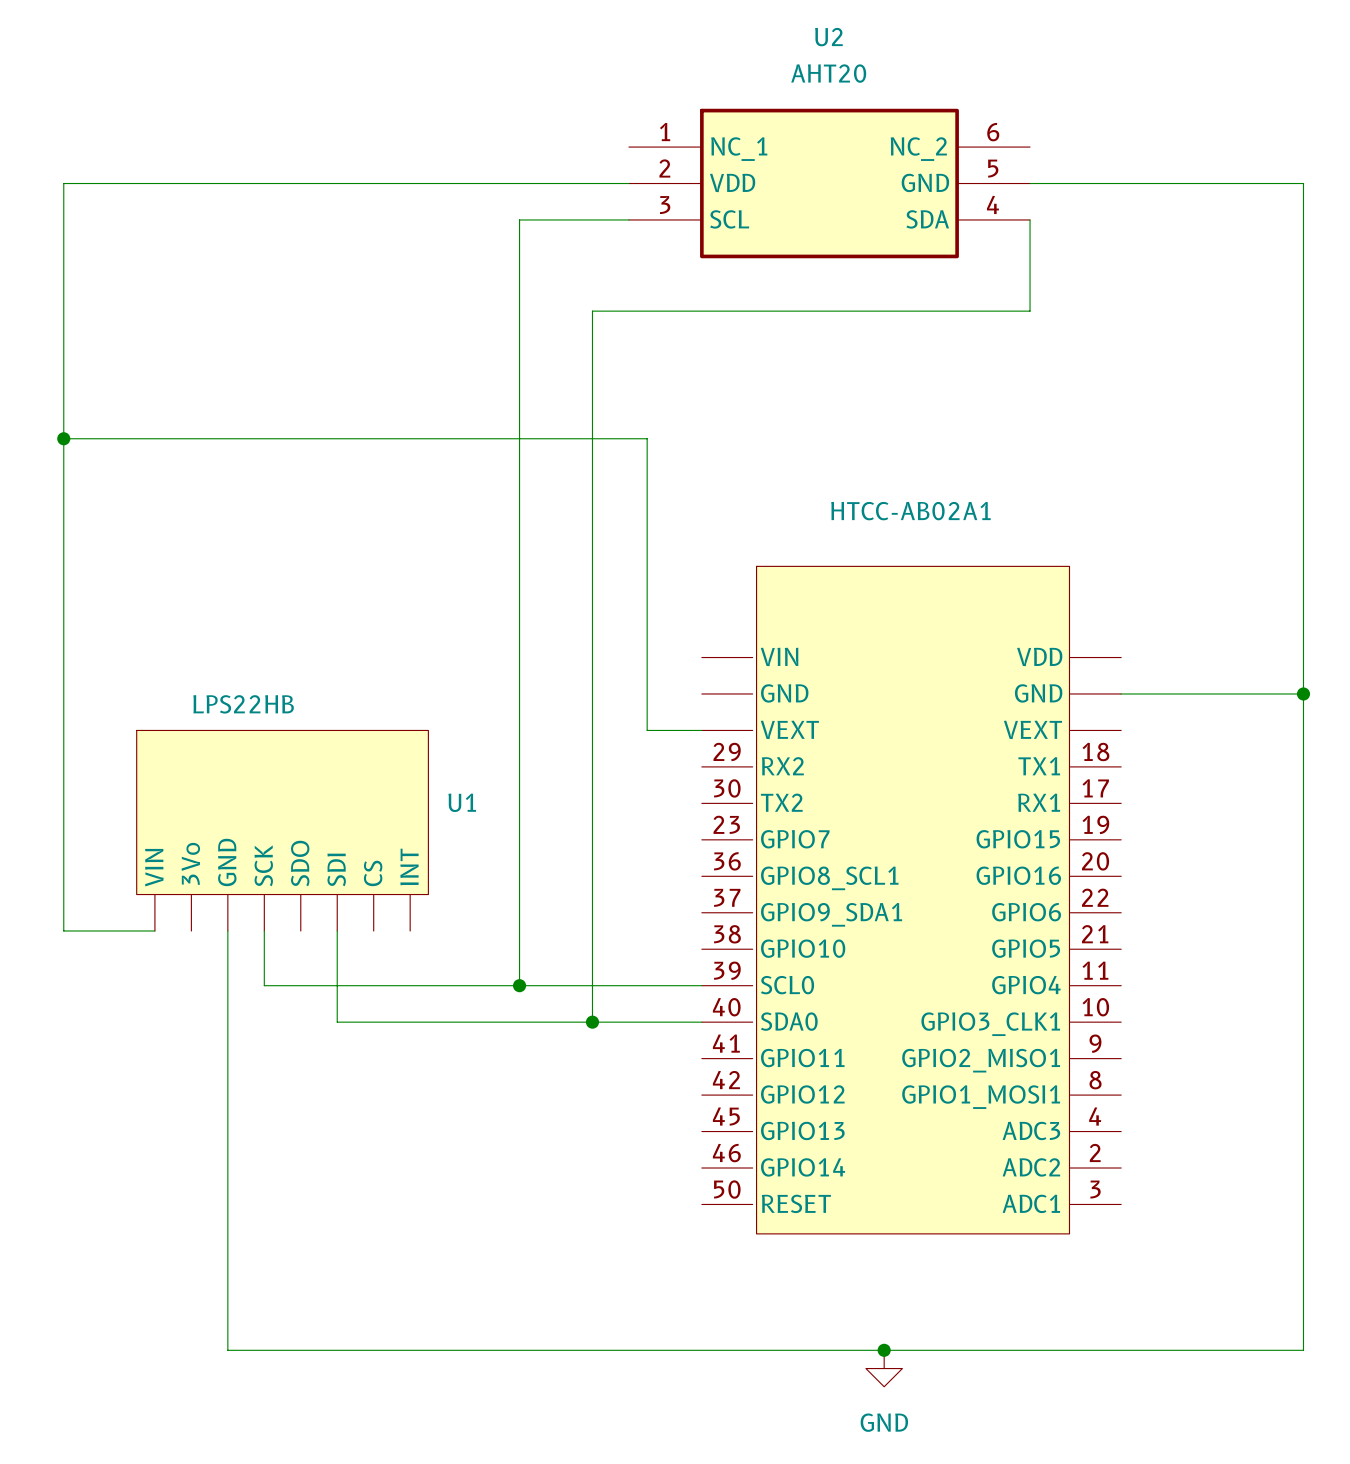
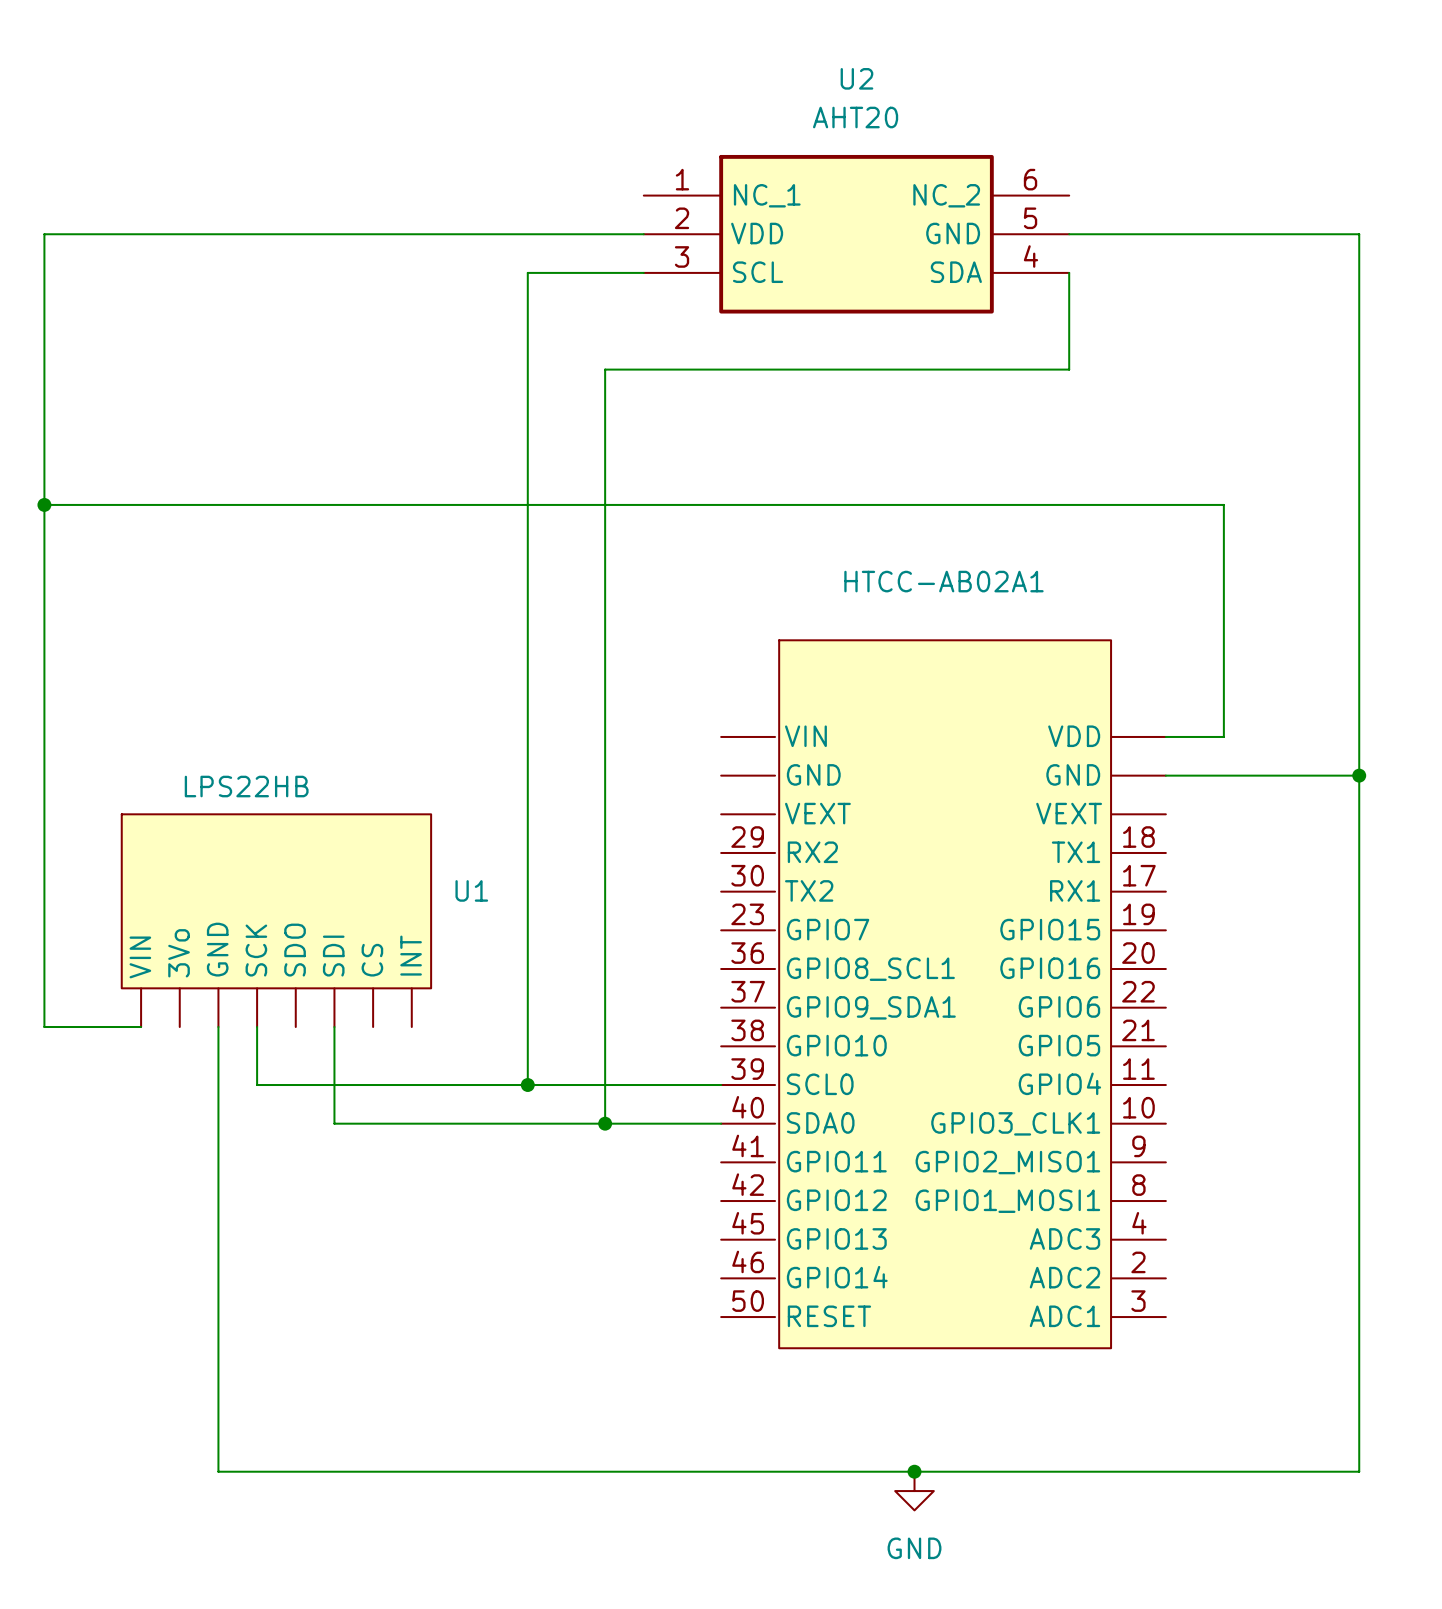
wire: (647, 438) (647, 730) (701, 730) -> (663, 504) (1223, 504) (1223, 736) (1165, 736)

